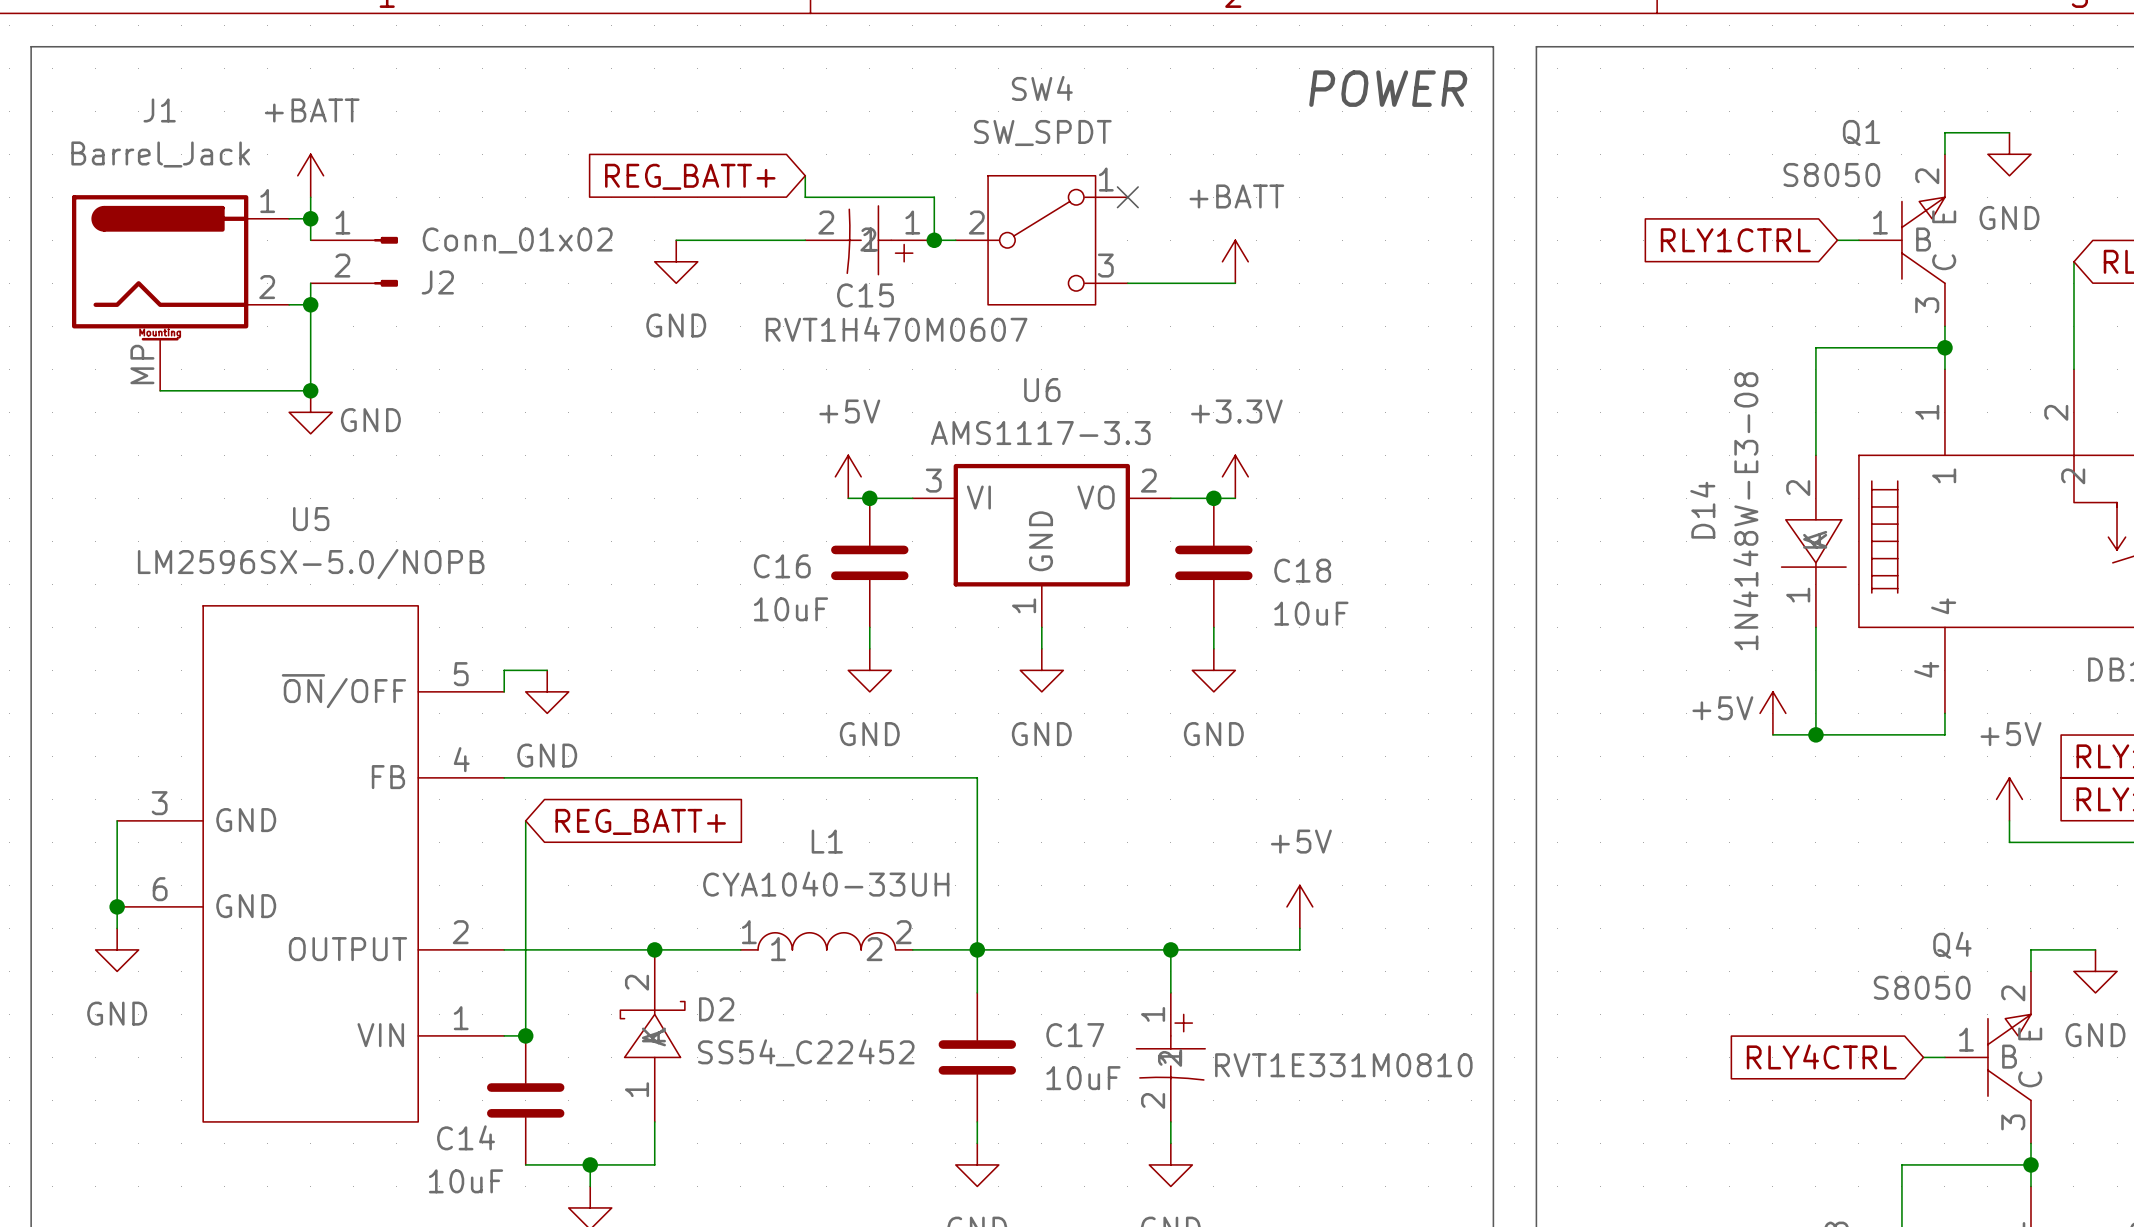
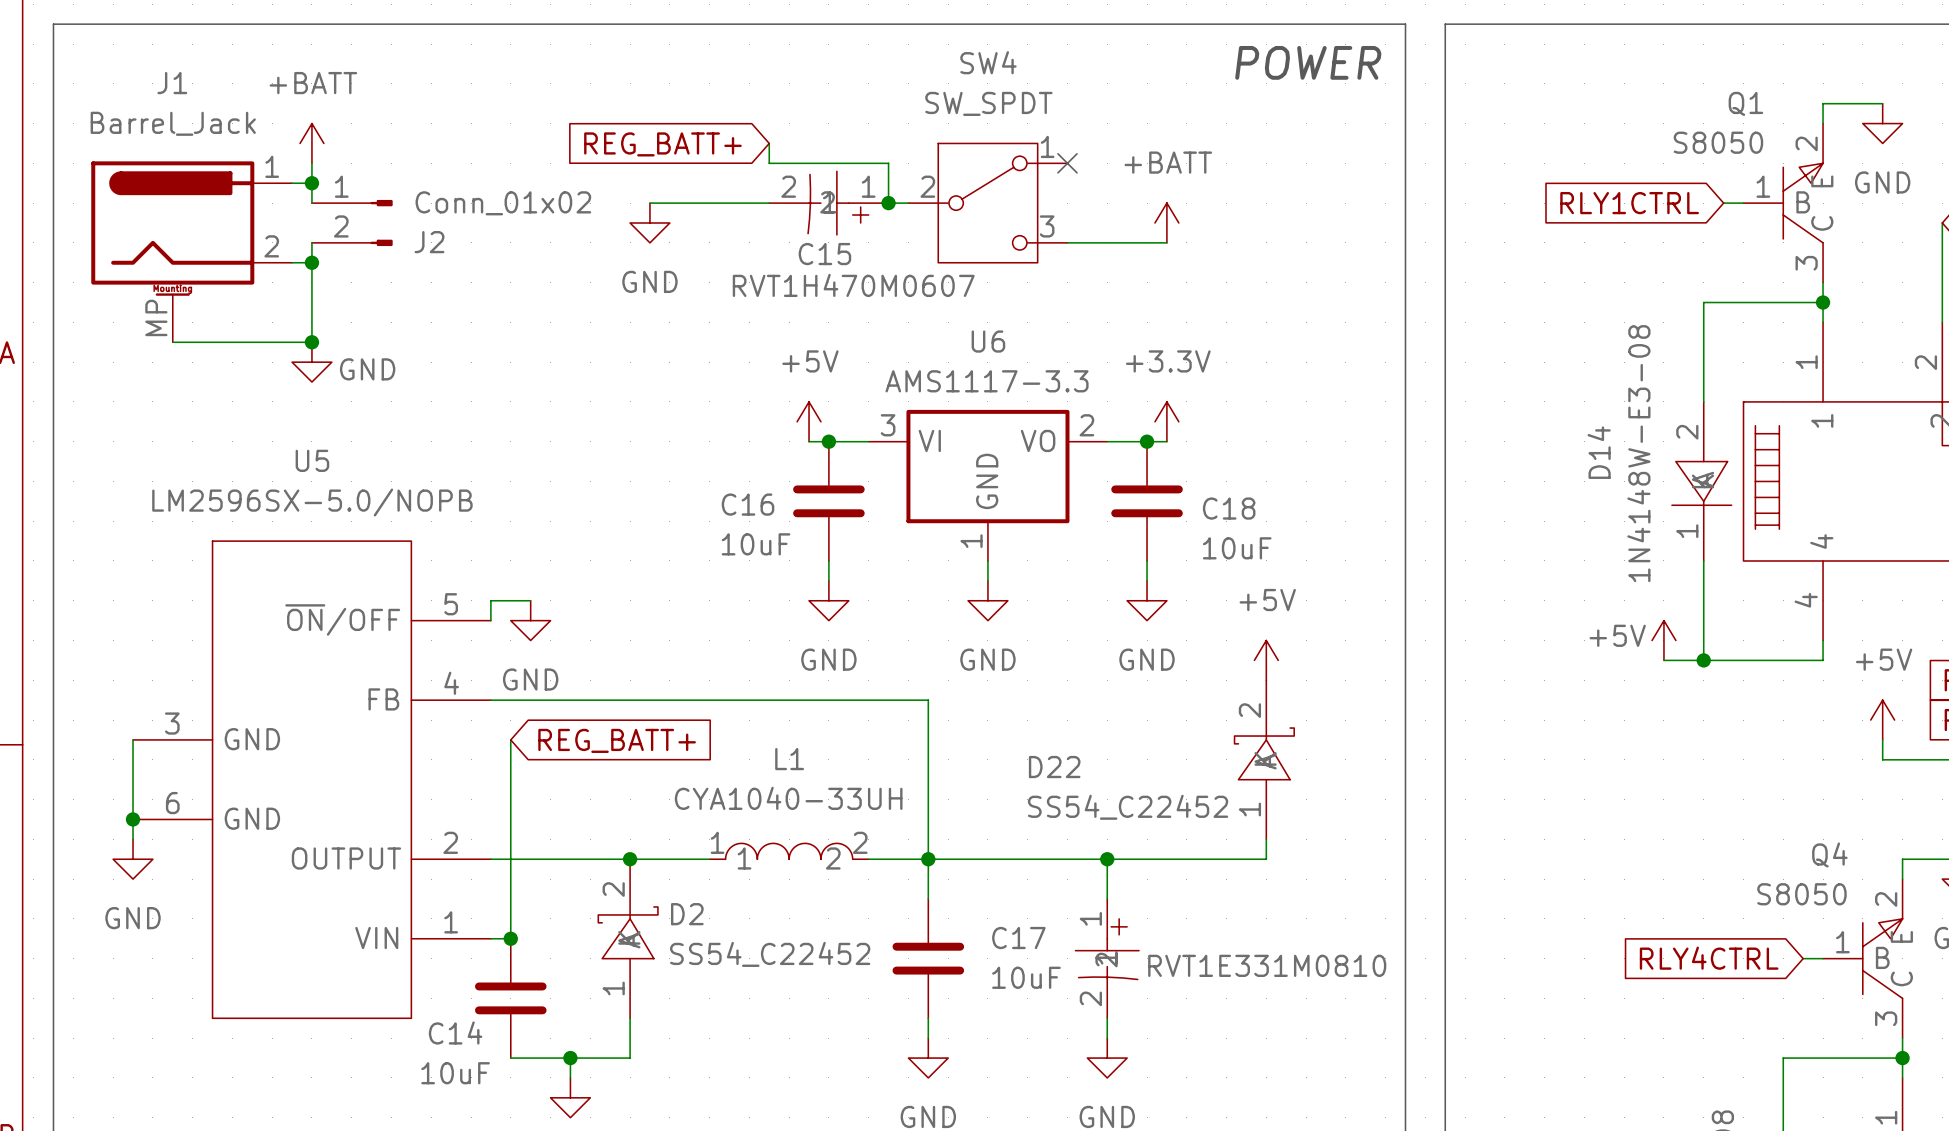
D22: none -> SS54_C22452 (1264, 759)
power symbol position: +5V (1299, 906) -> +5V (1266, 660)
wire: (1299, 928) (1299, 949) -> (1266, 839) (1266, 859) (1226, 859)

